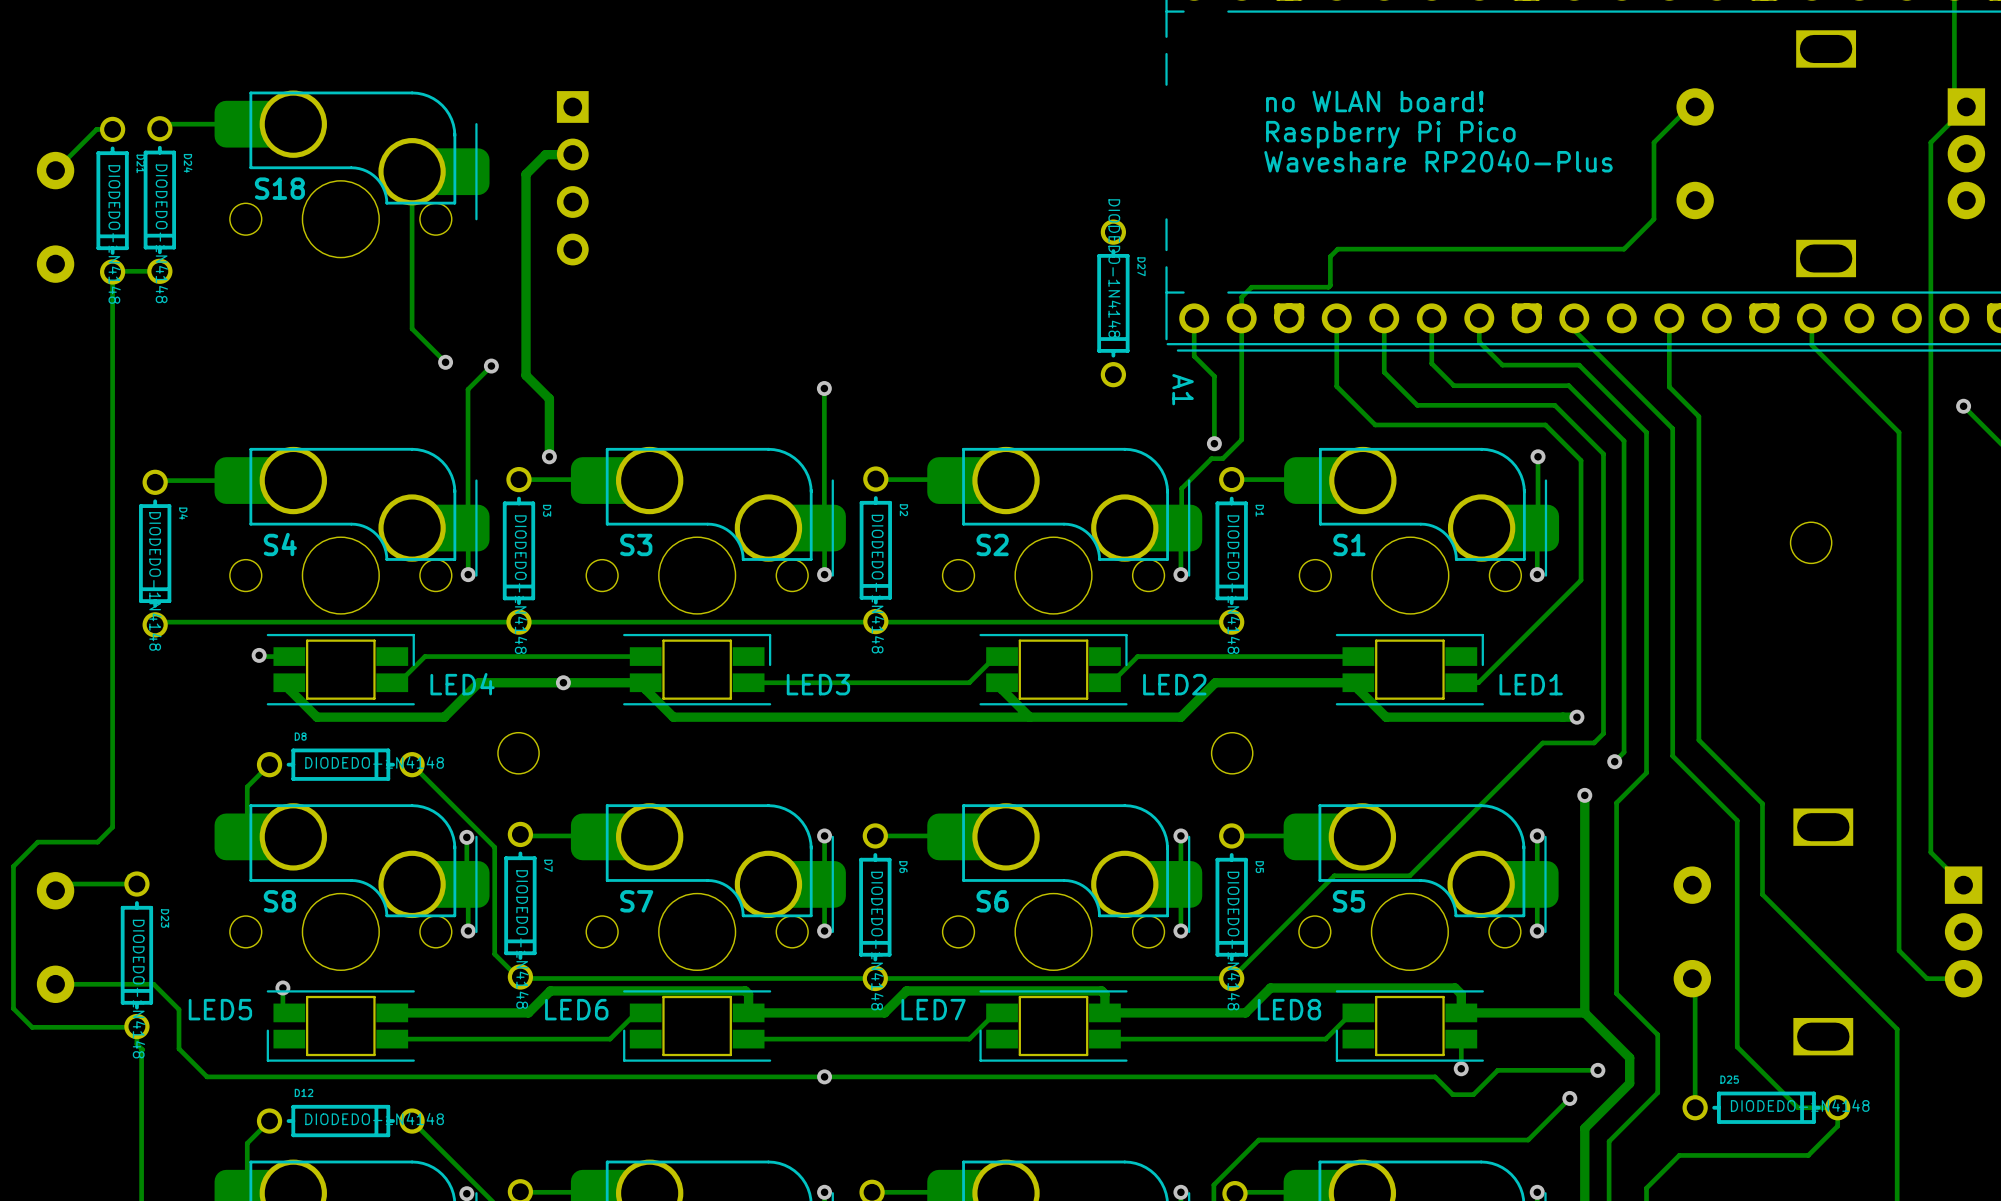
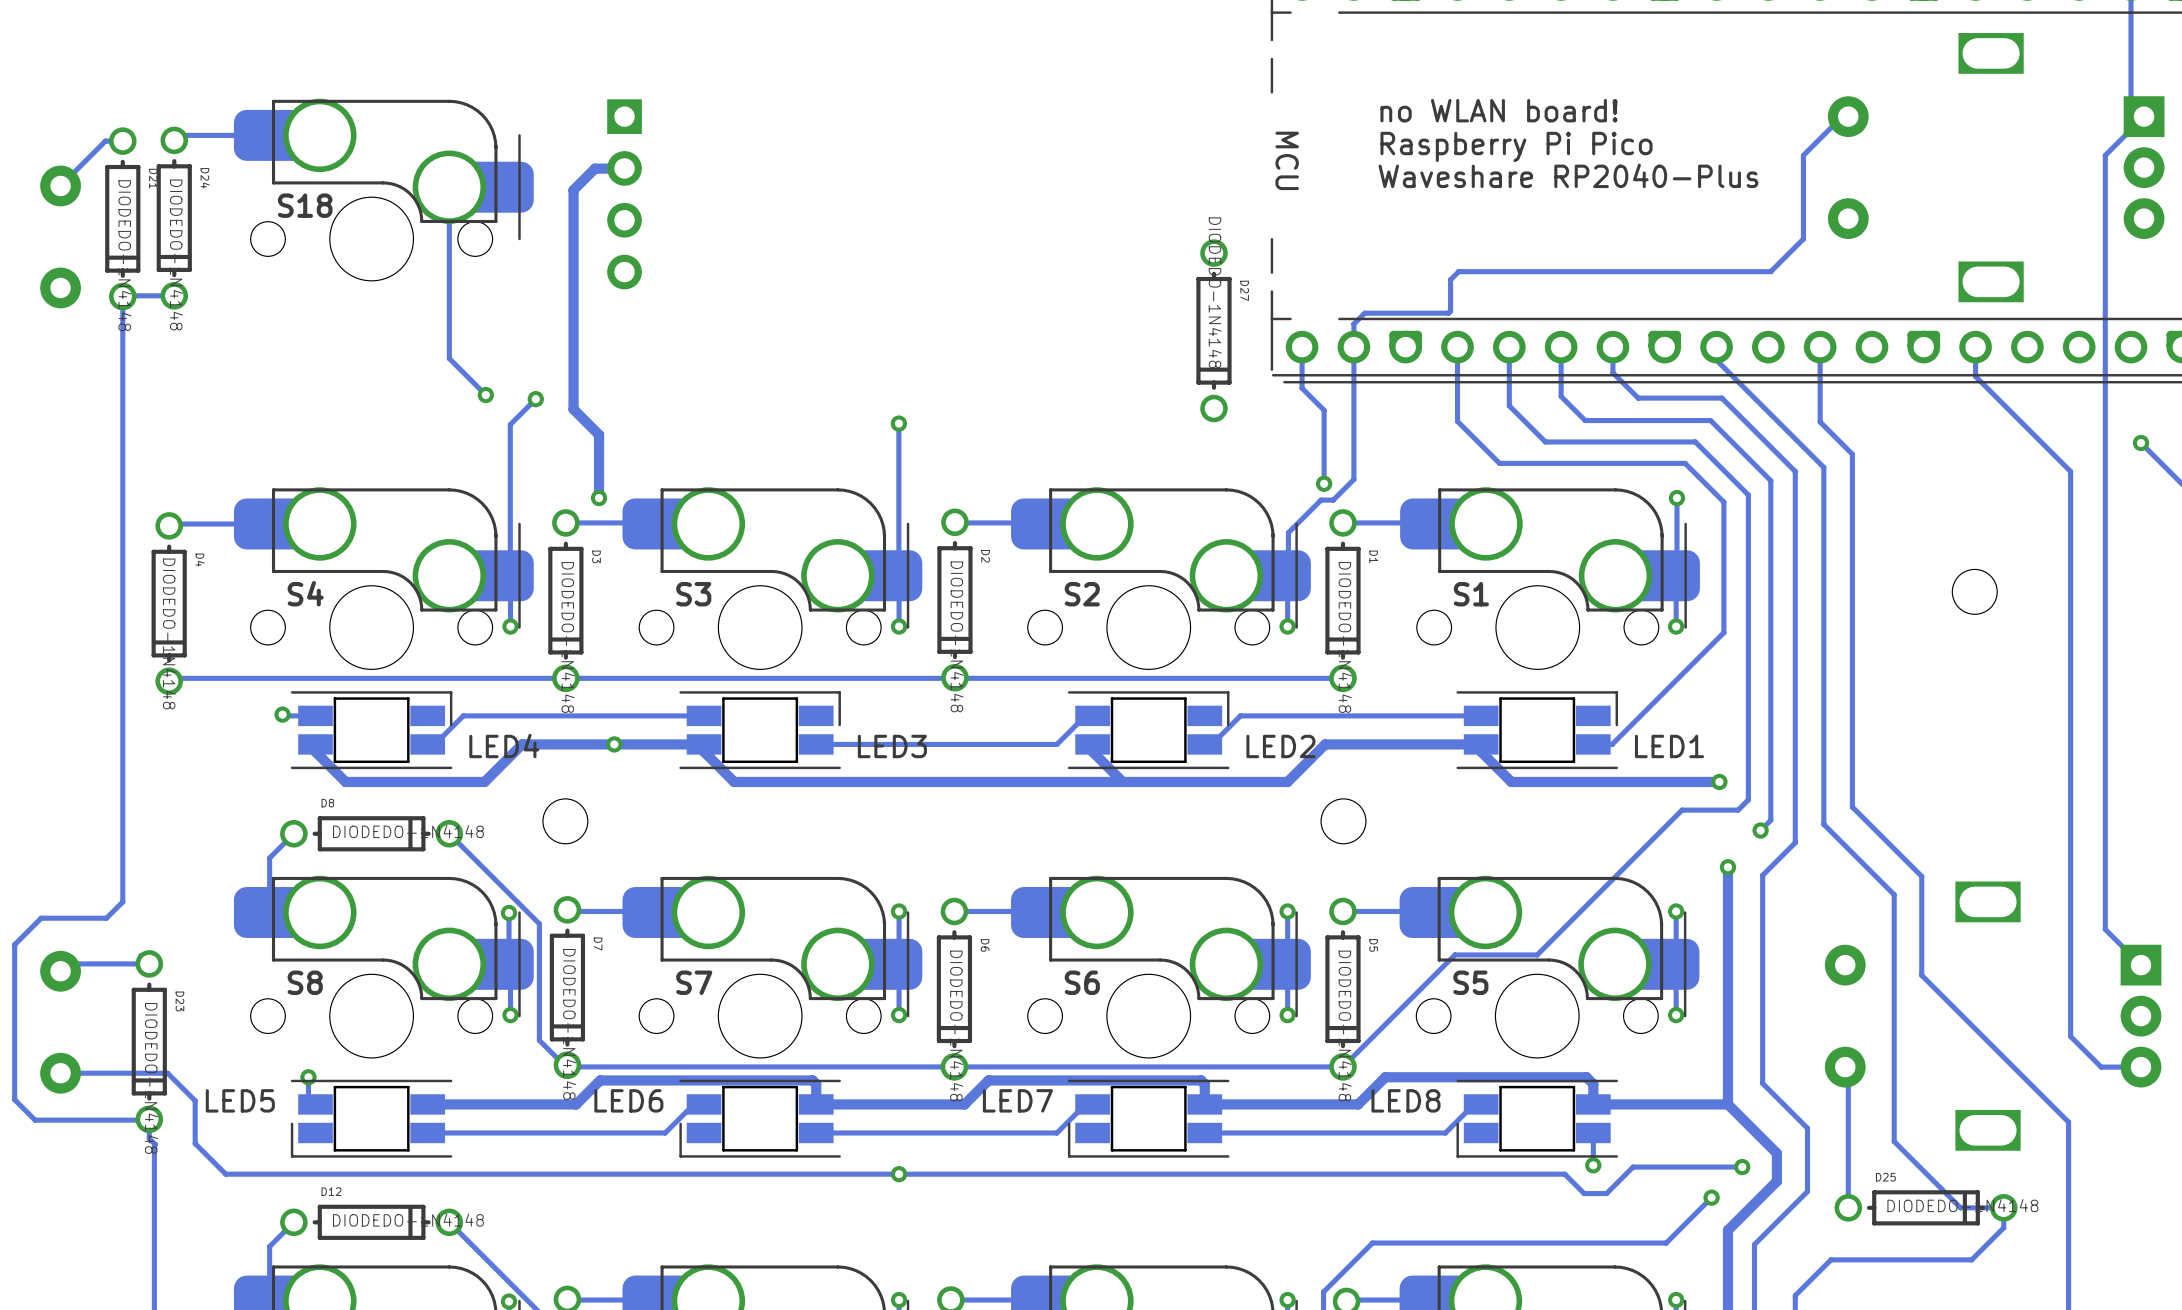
A1 name: A1 (1183, 389) -> MCU (1287, 160)

